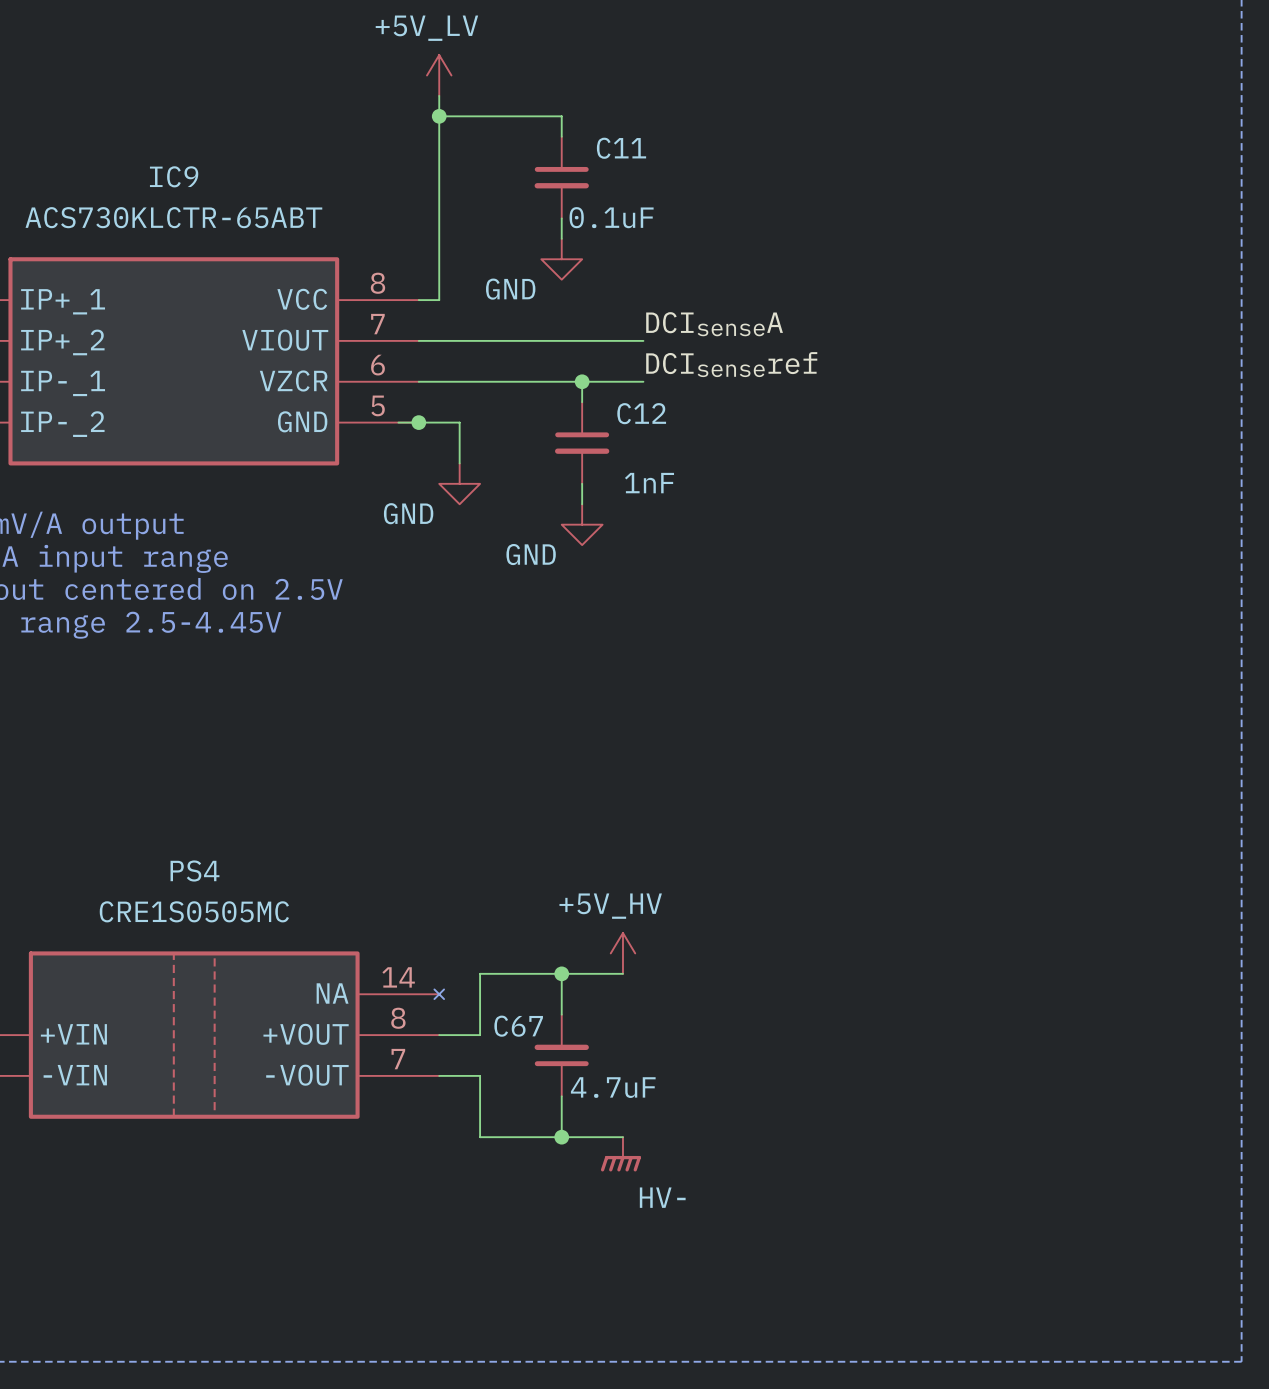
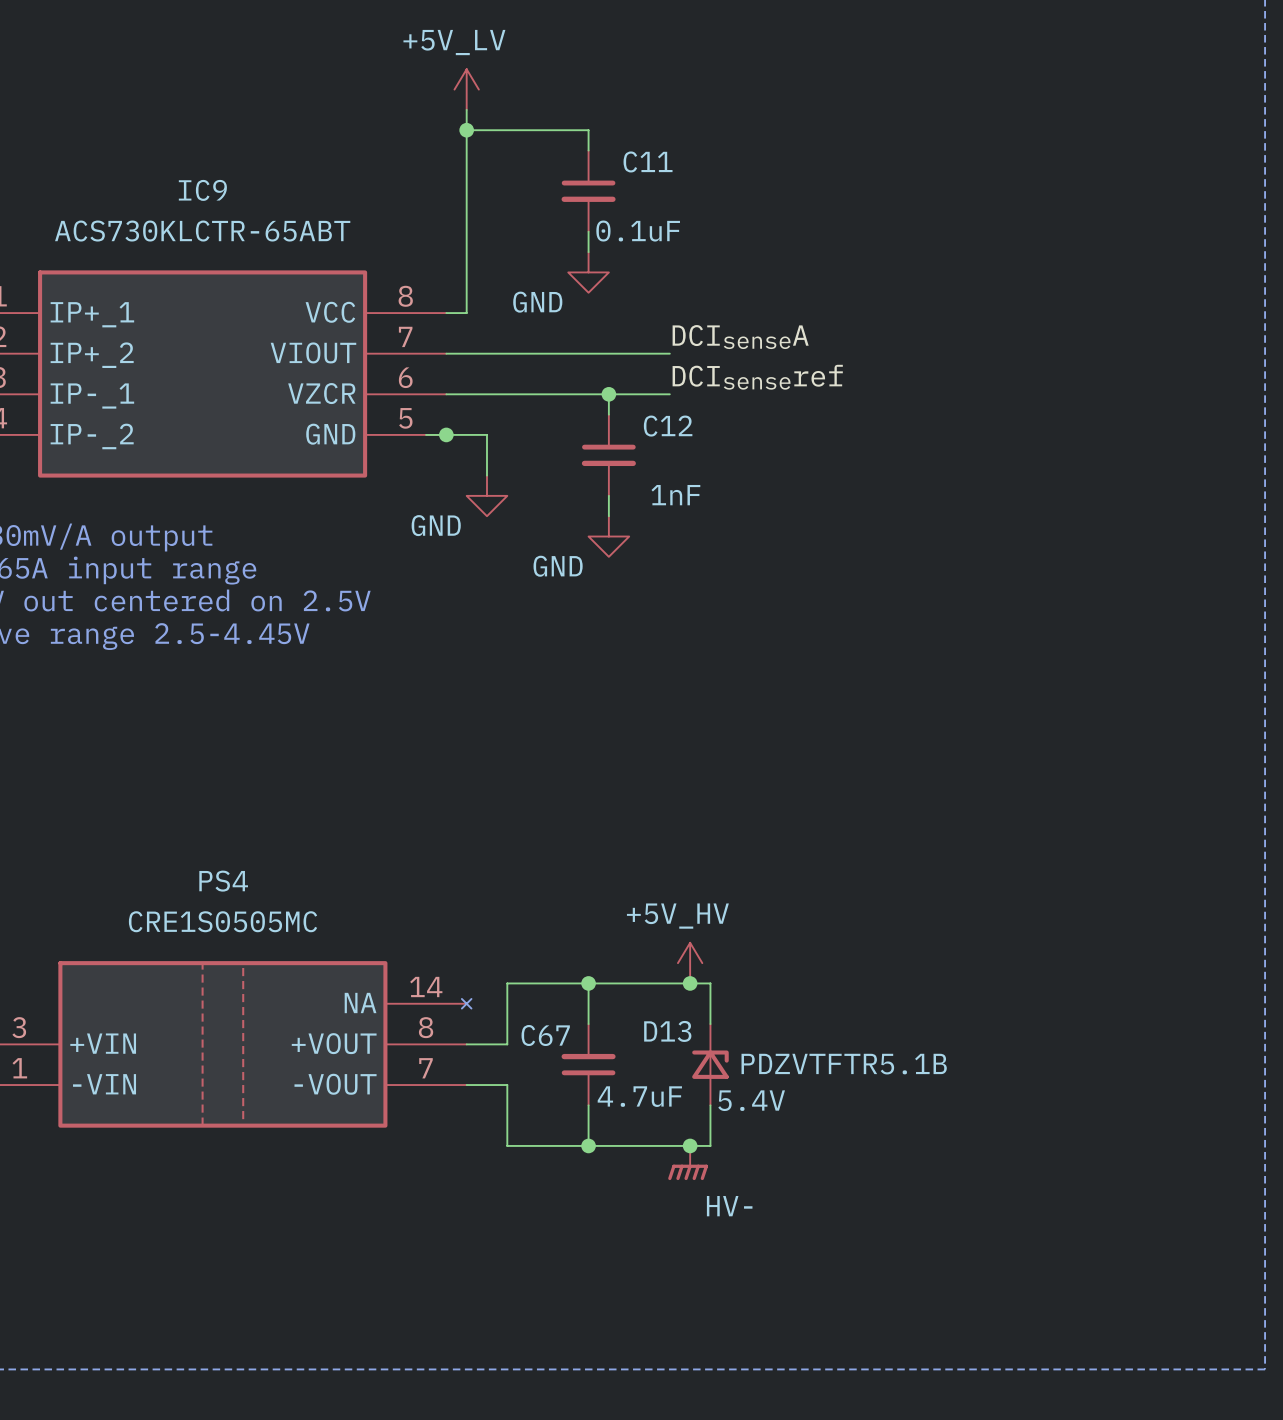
power symbol position: +5V_HV (622, 953) -> +5V_HV (690, 963)
wire: none -> (649, 983) (710, 983) (710, 1024)
junction: none -> (690, 983)
D13: none -> PDZVTFTR5.1B (710, 1064)
wire: none -> (710, 1105) (710, 1145) (649, 1145)
junction: none -> (690, 1145)
power symbol position: HV- (620, 1154) -> HV- (688, 1163)

